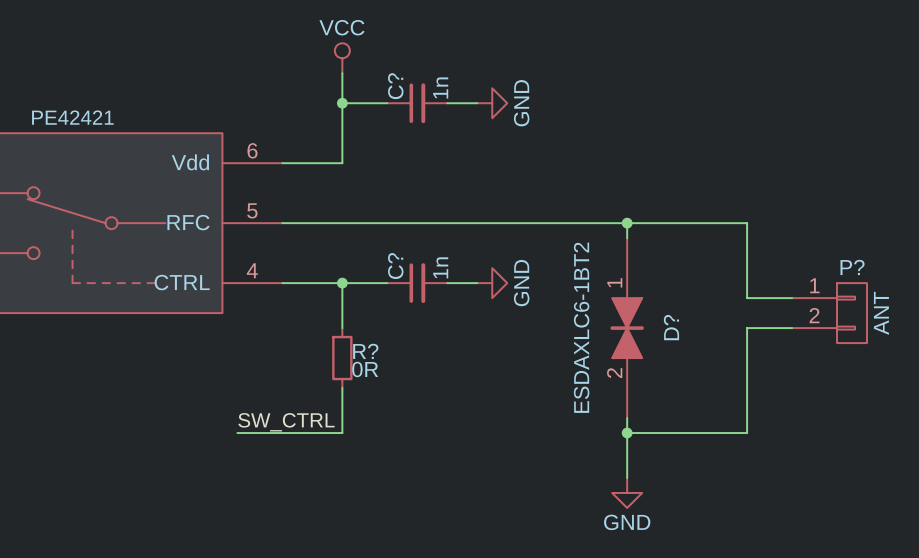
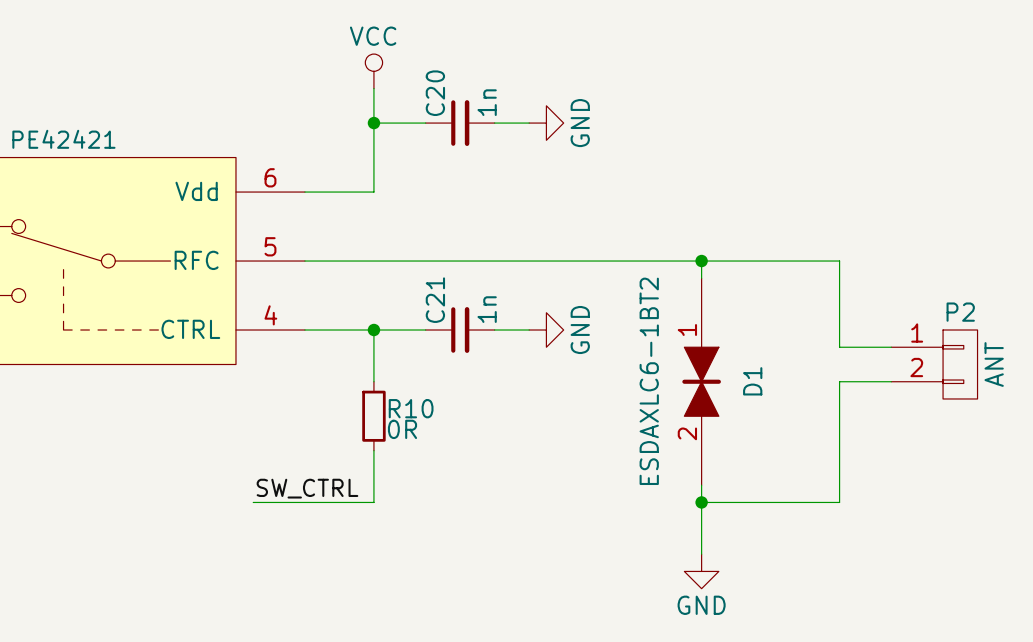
C? name: C? (395, 86) -> C20 (435, 93)
C? name: C? (395, 266) -> C21 (435, 300)
P? name: P? (852, 267) -> P2 (960, 312)
D? name: D? (671, 327) -> D1 (752, 381)
R? name: R? (365, 351) -> R10 (411, 408)

